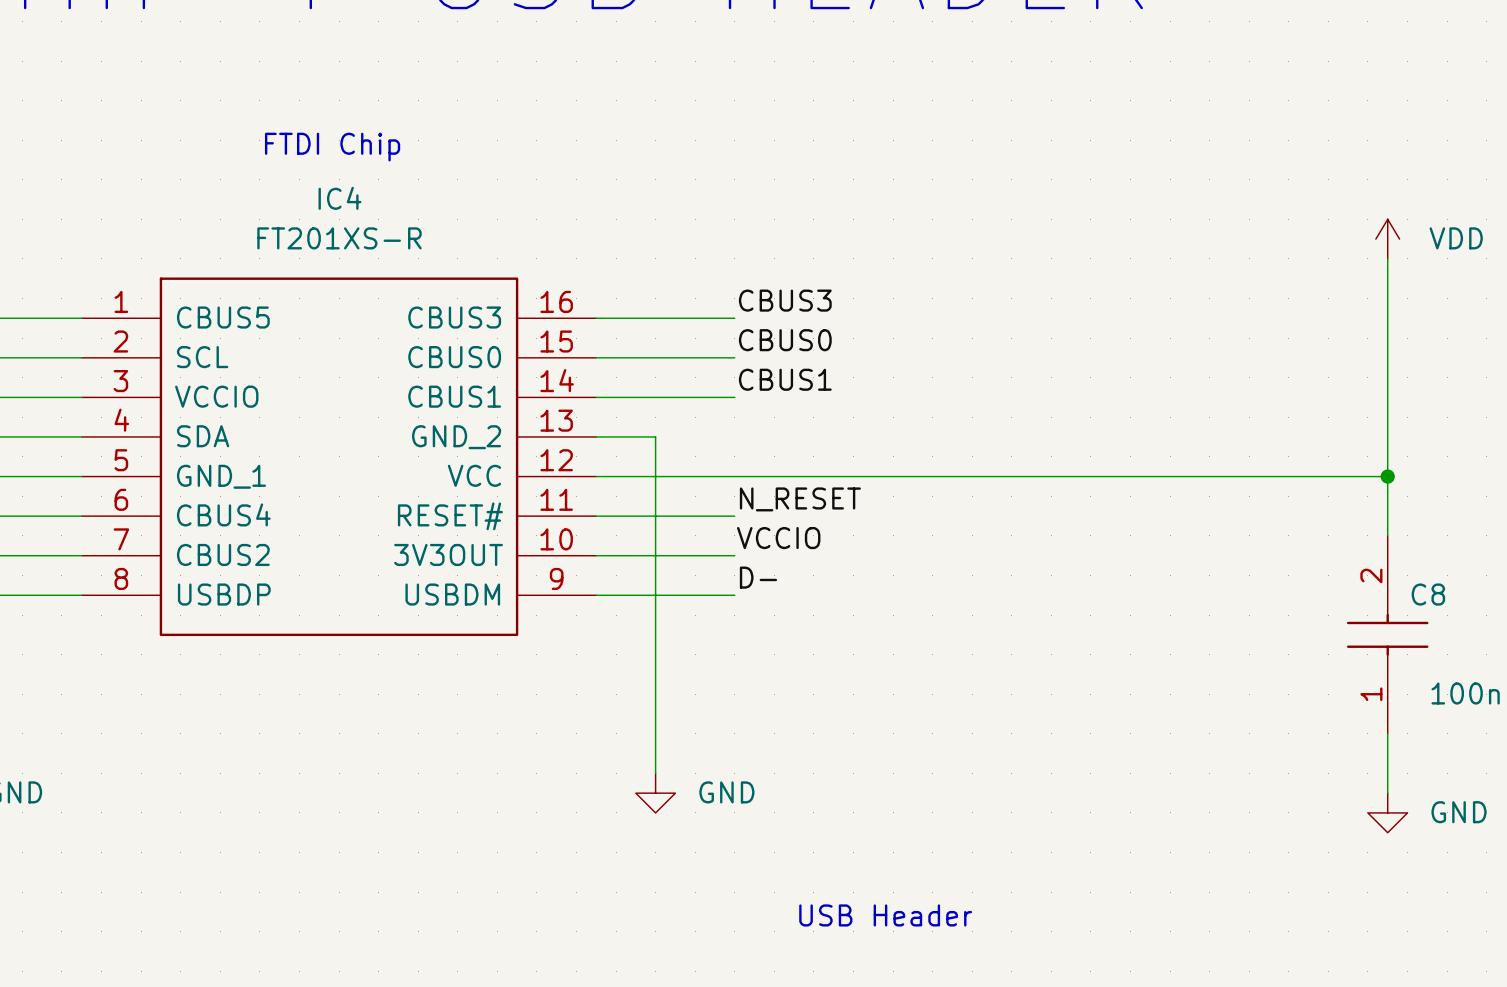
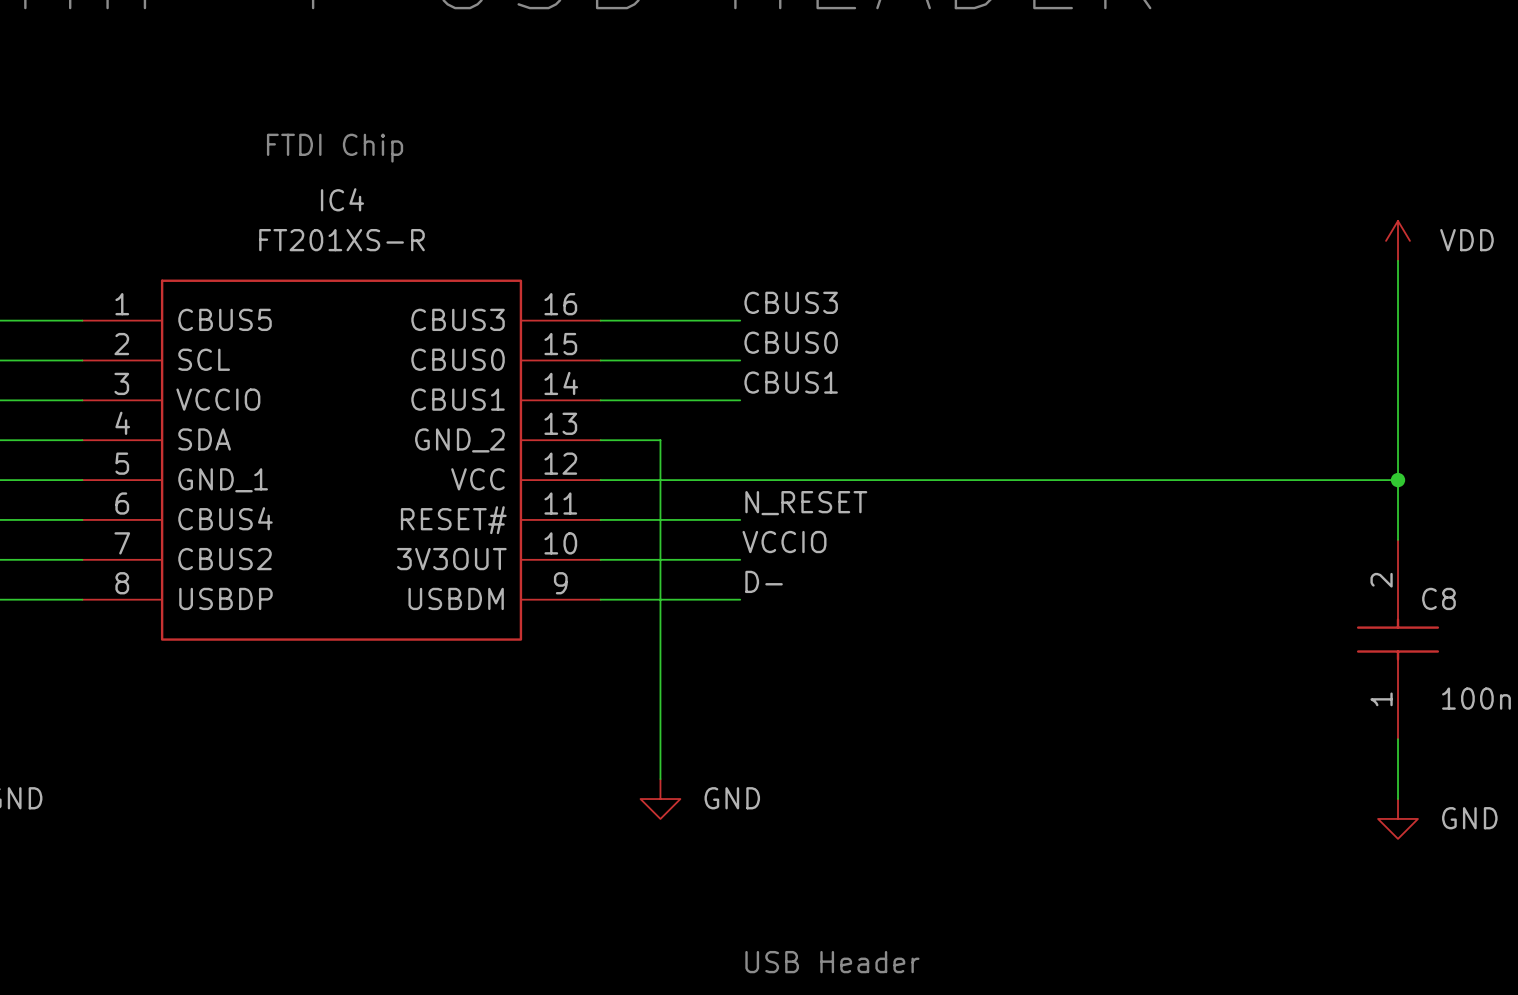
text position: USB Header (885, 915) -> USB Header (832, 962)

